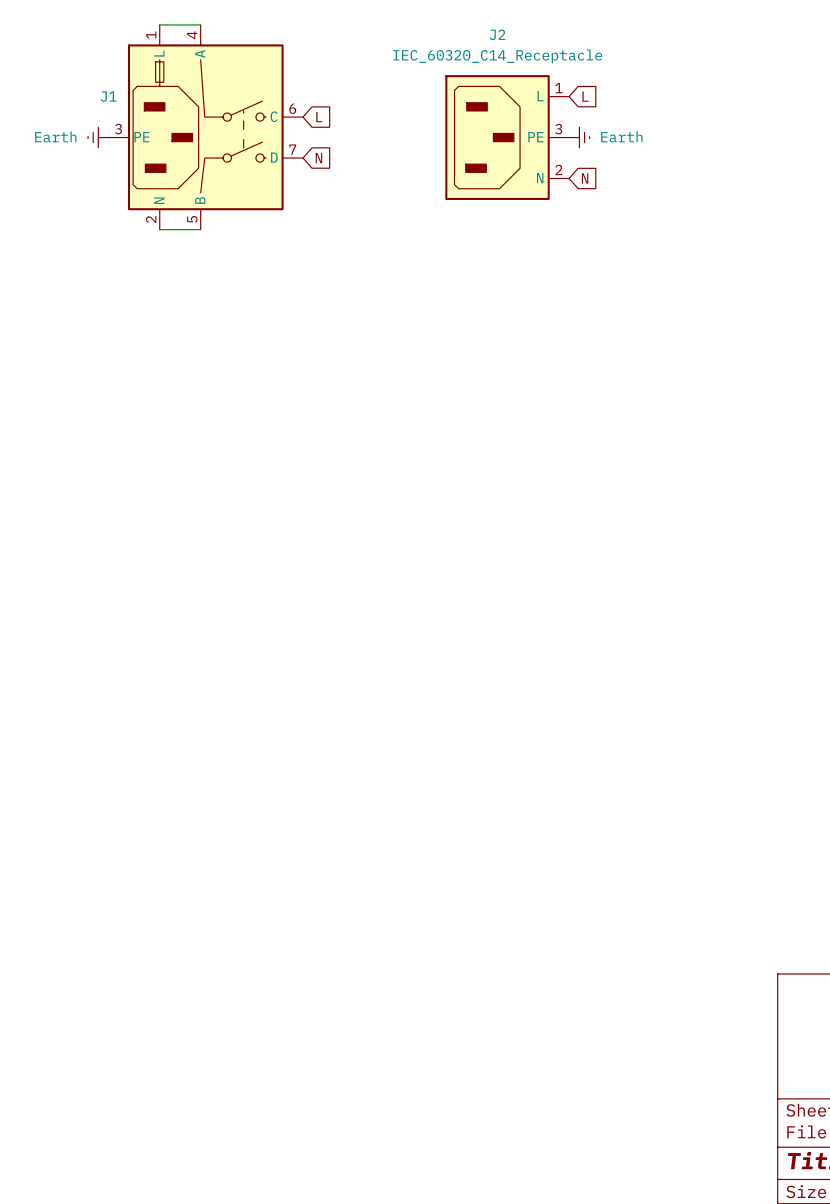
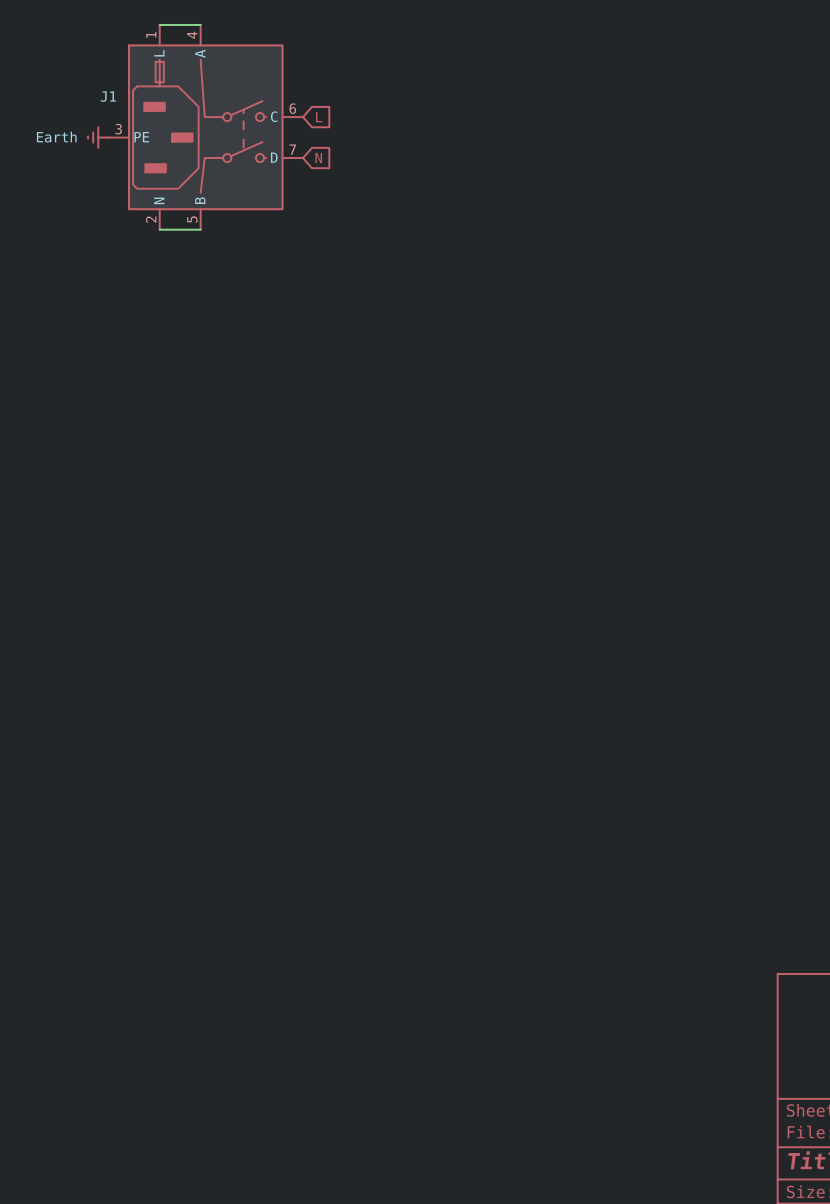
global label: L (585, 96) -> none
J2: IEC_60320_C14_Receptacle (507, 137) -> none
power symbol: Earth (579, 137) -> none
global label: N (585, 178) -> none

